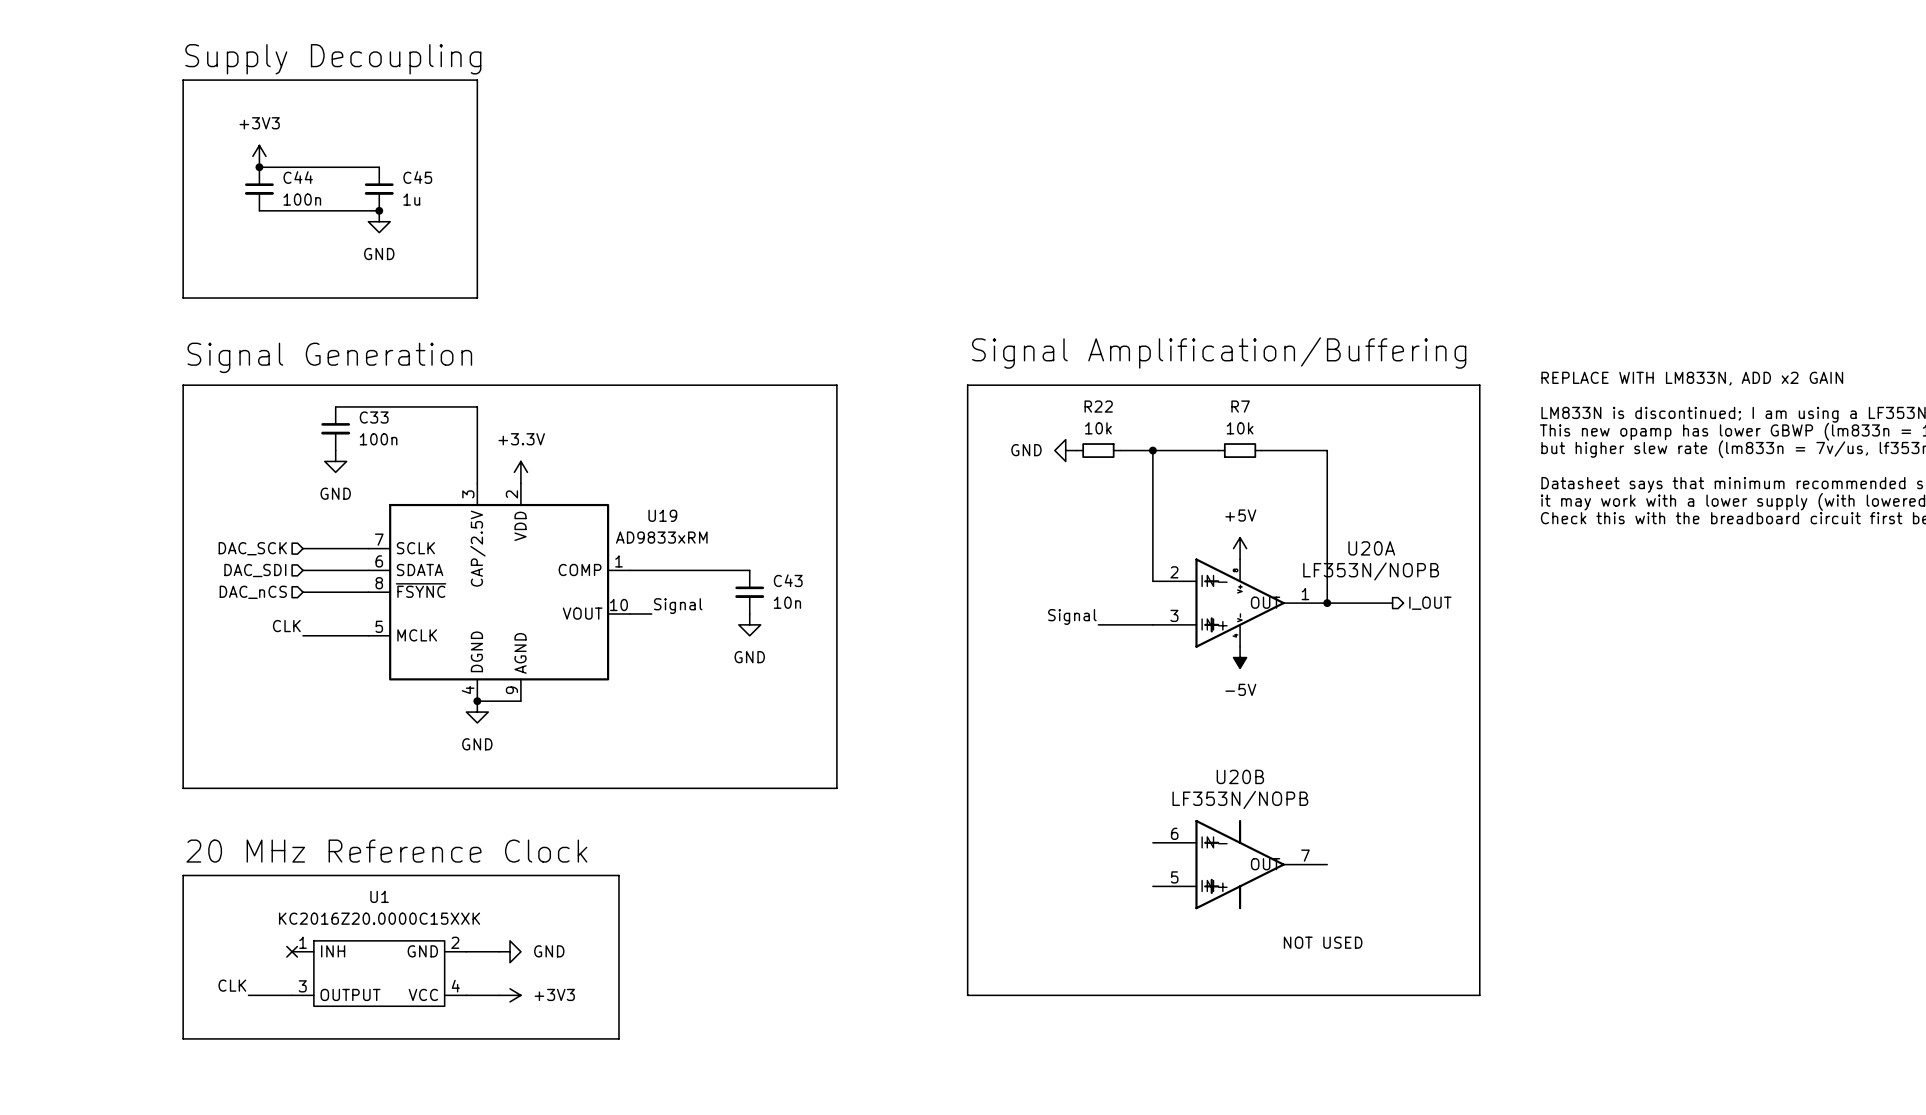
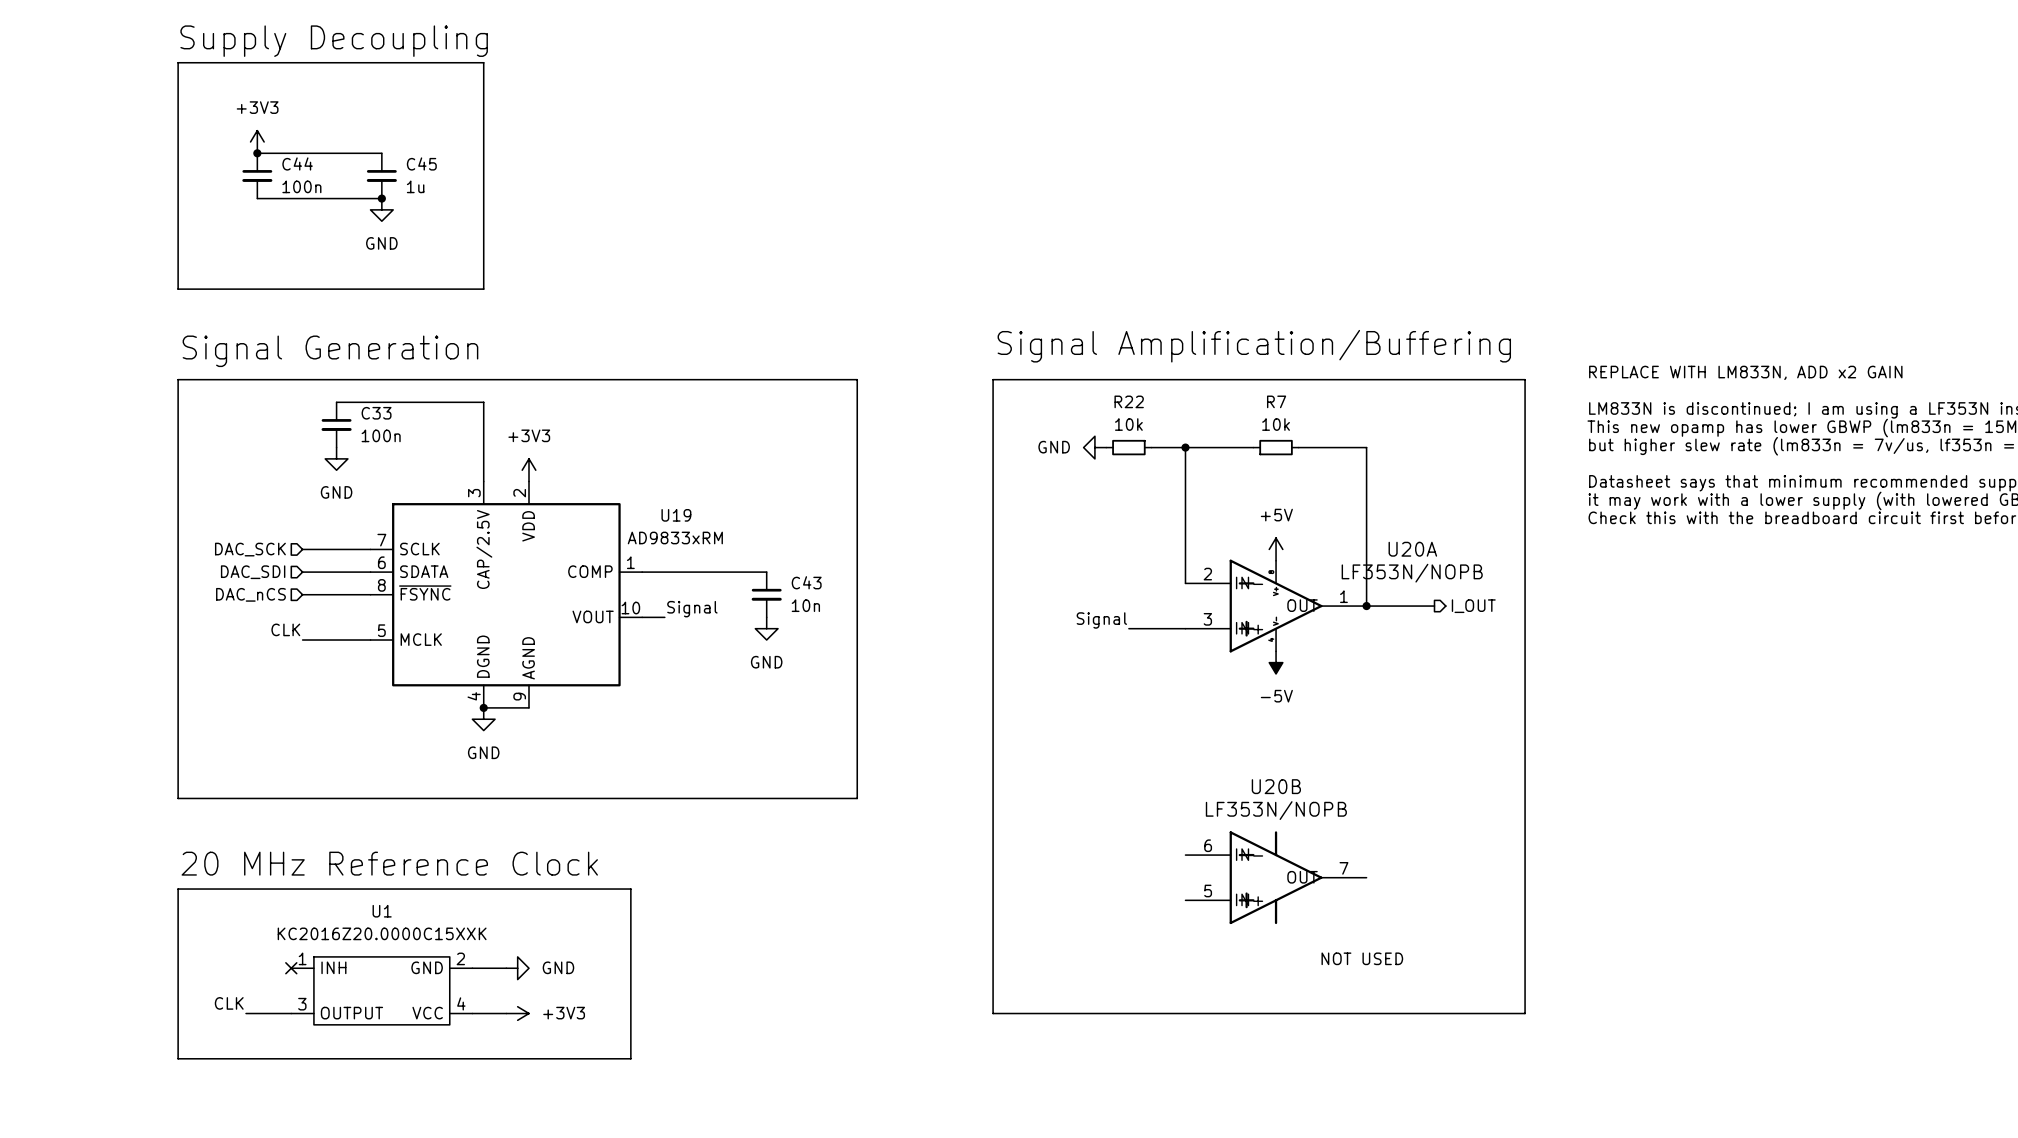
power symbol: +3.3V (520, 472) -> +3V3 (528, 470)

